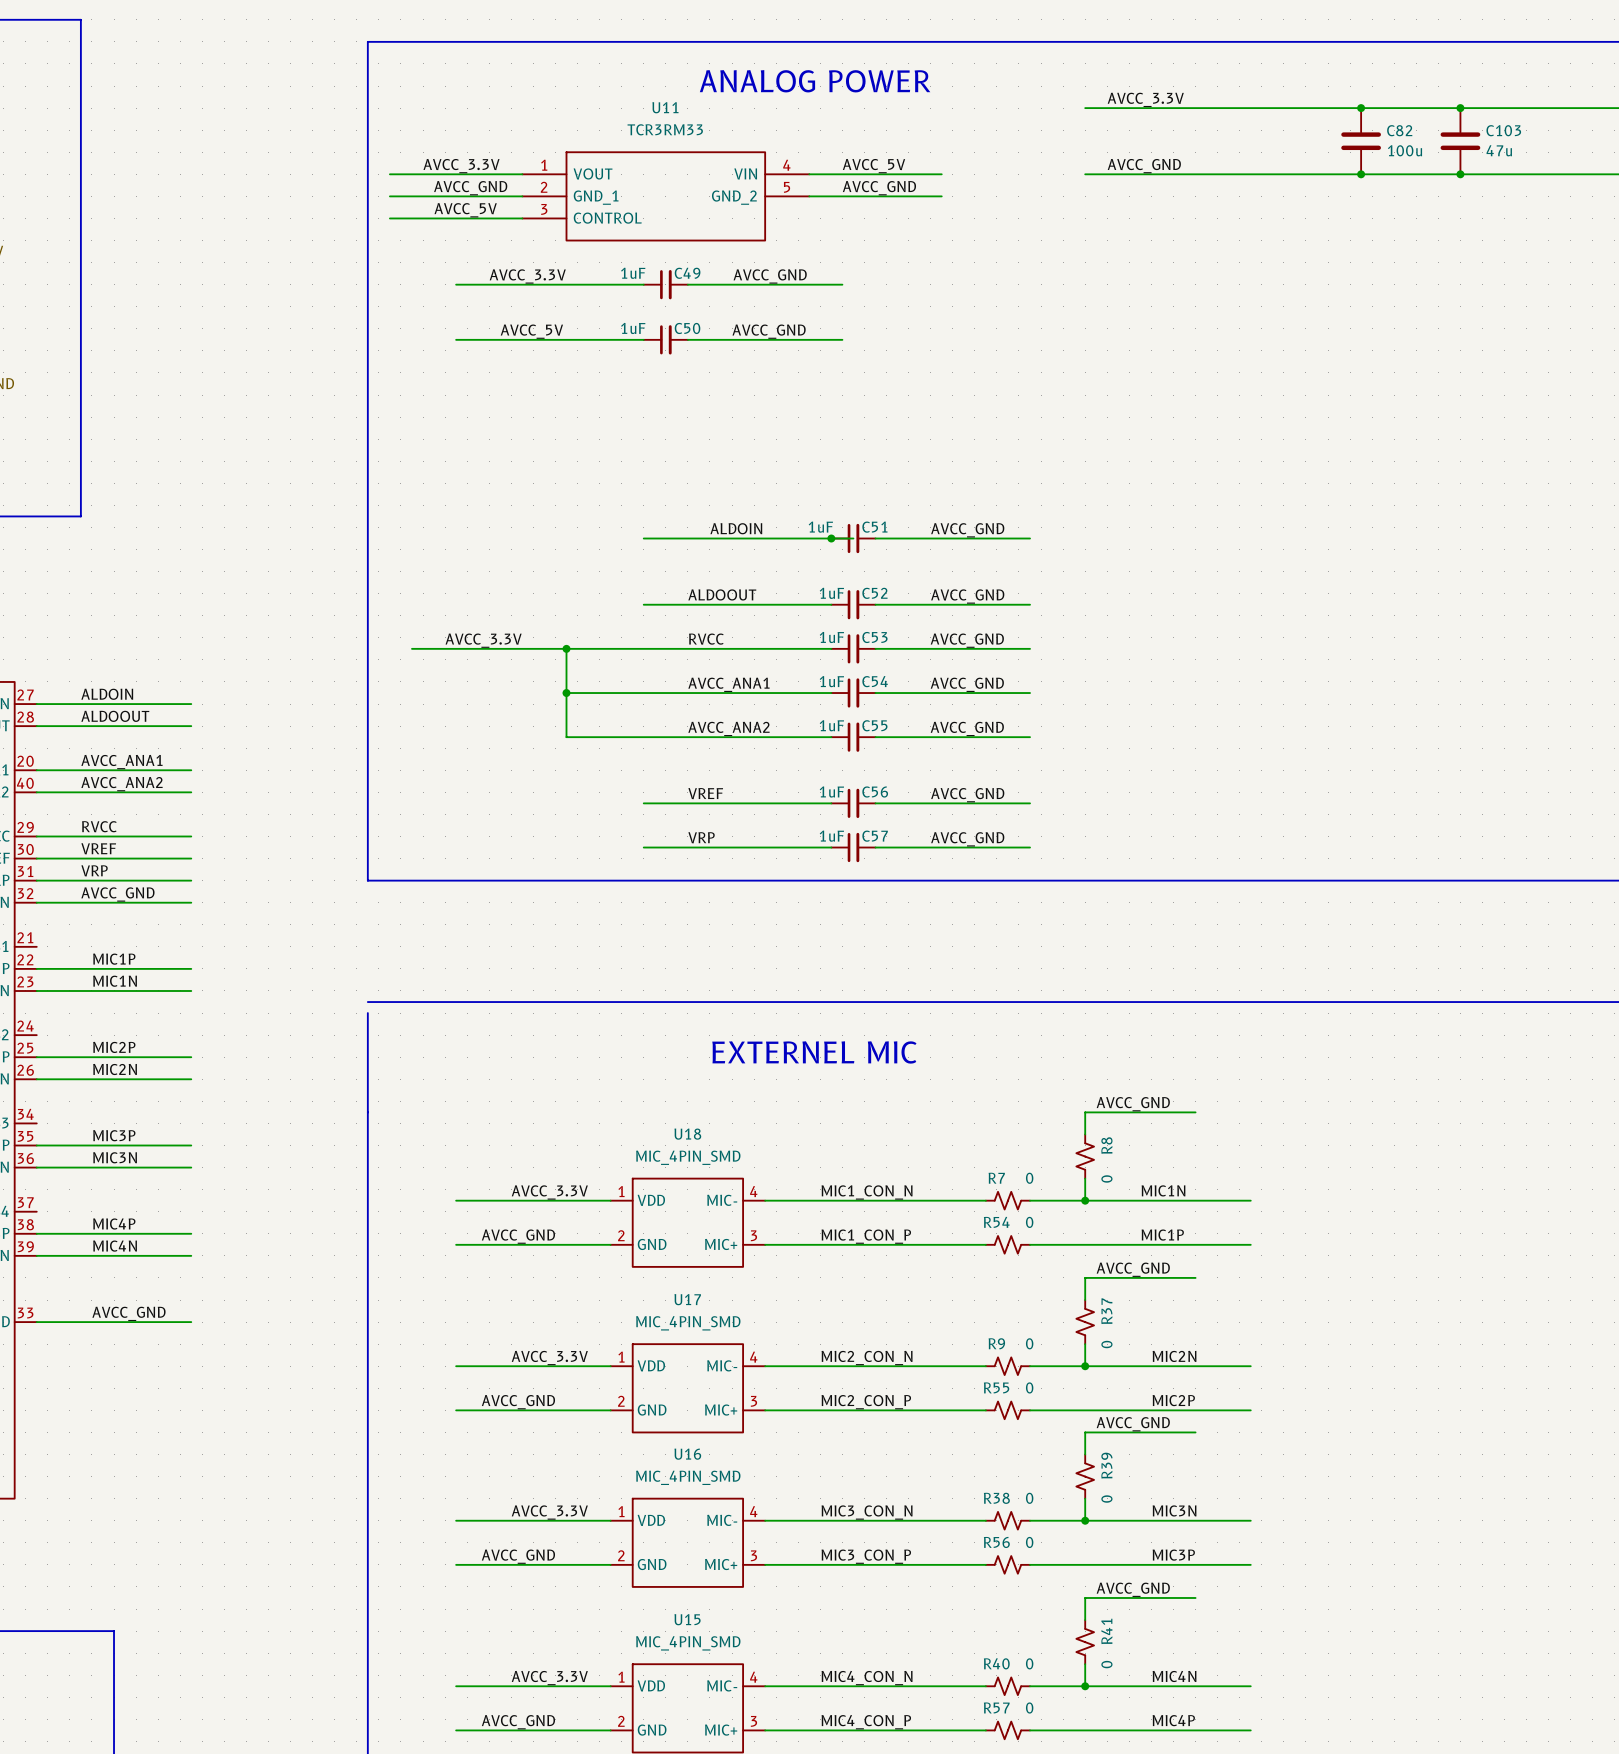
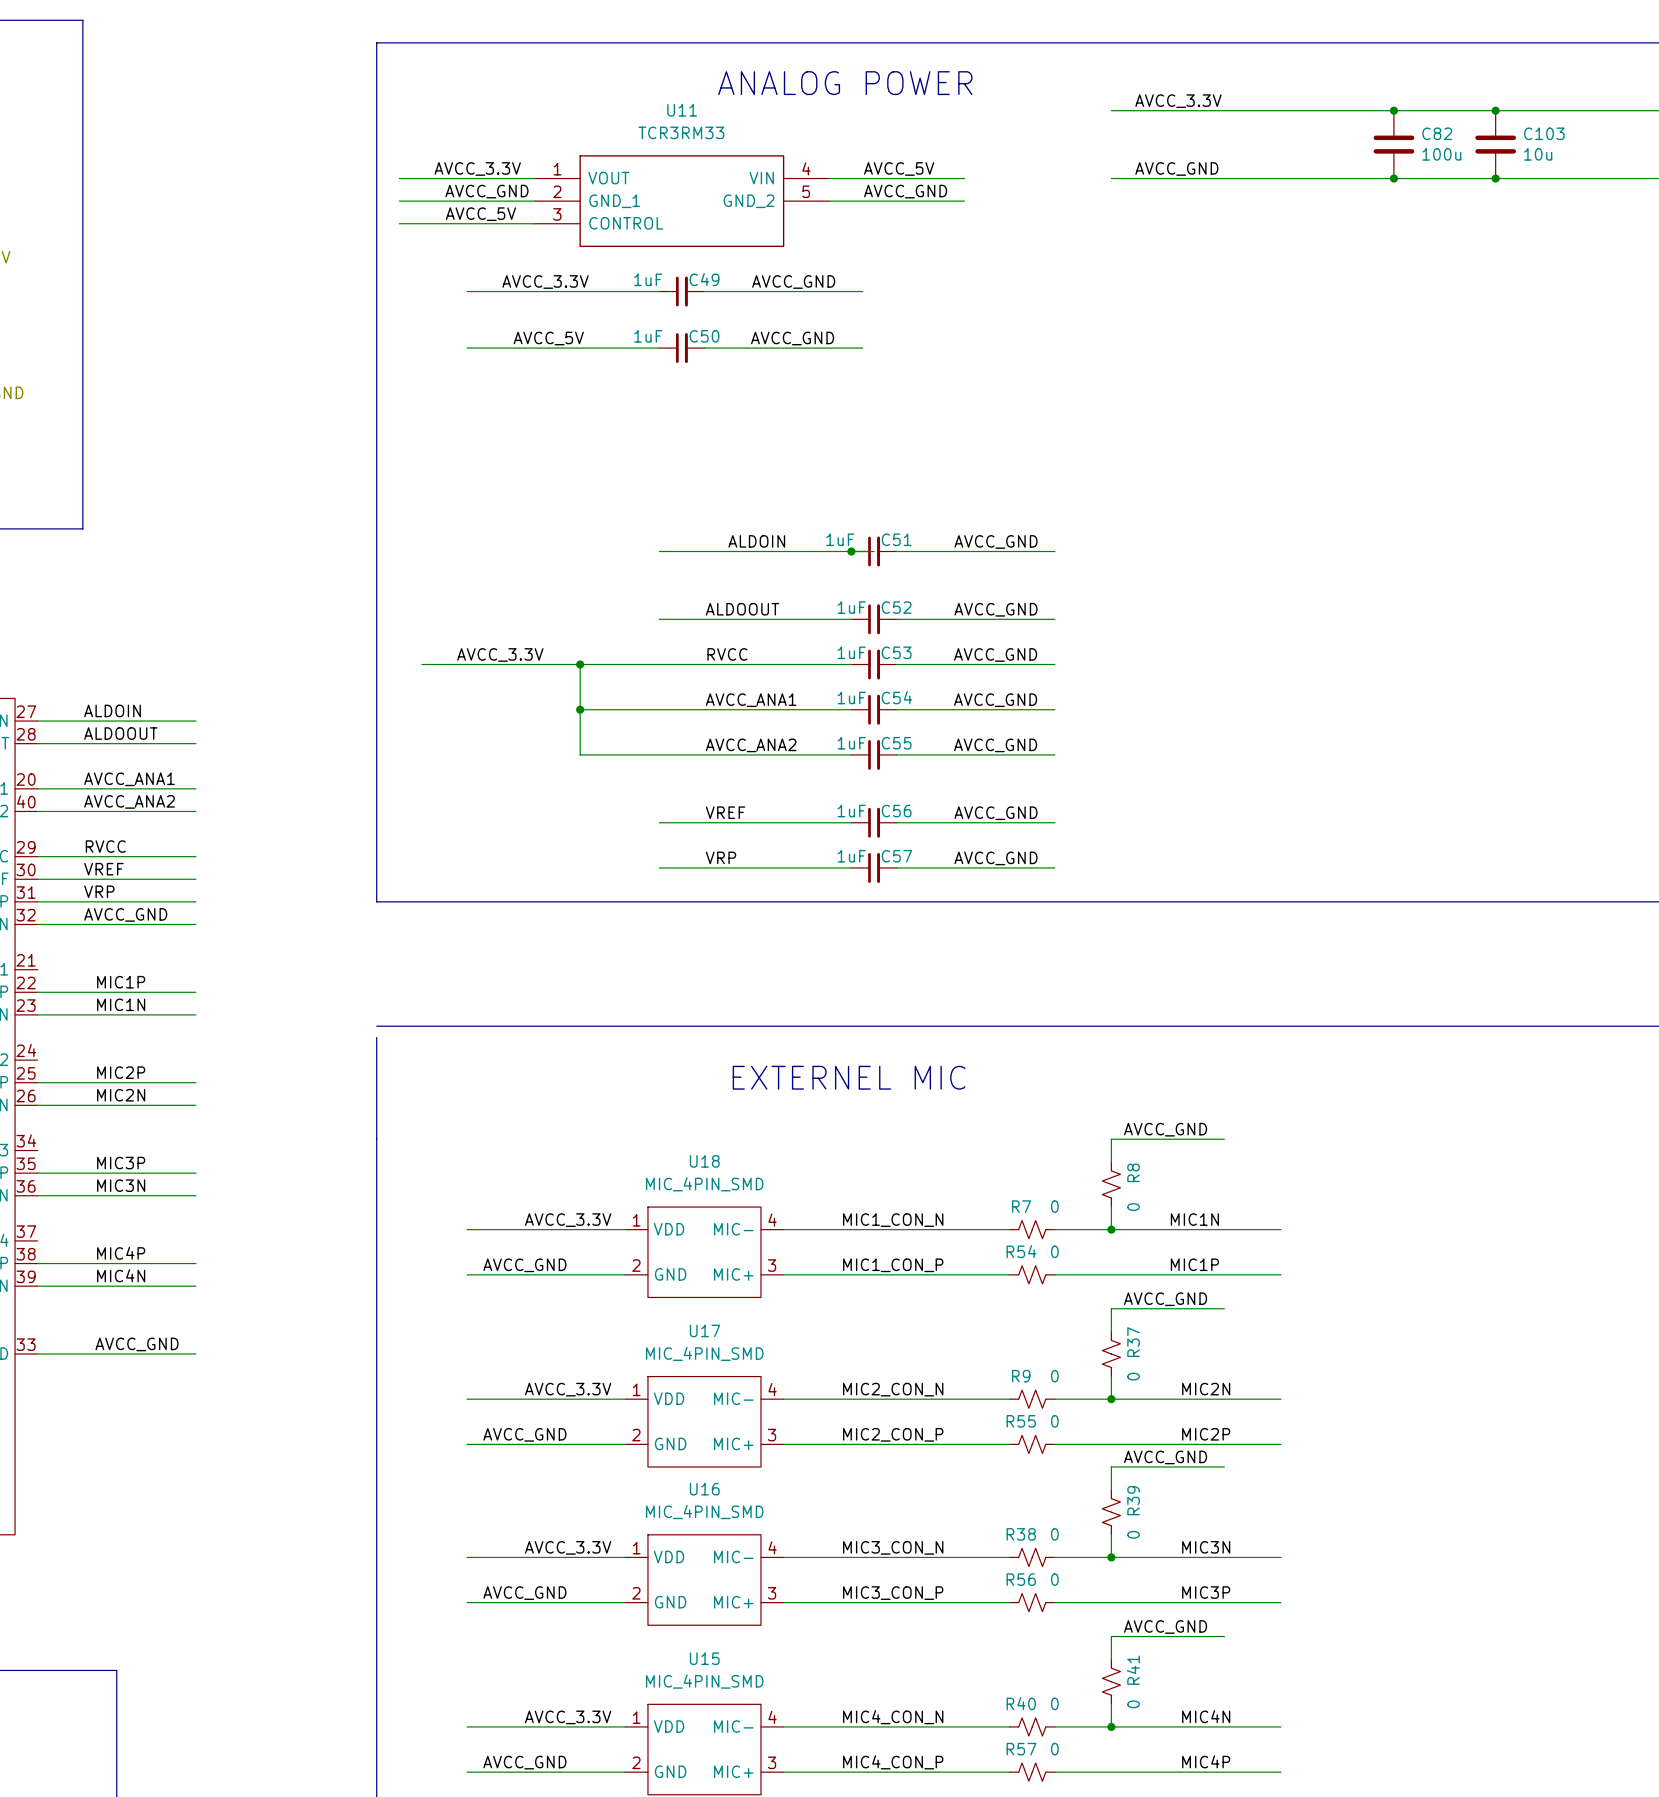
C103 value: 47u (1499, 150) -> 10u (1538, 154)

